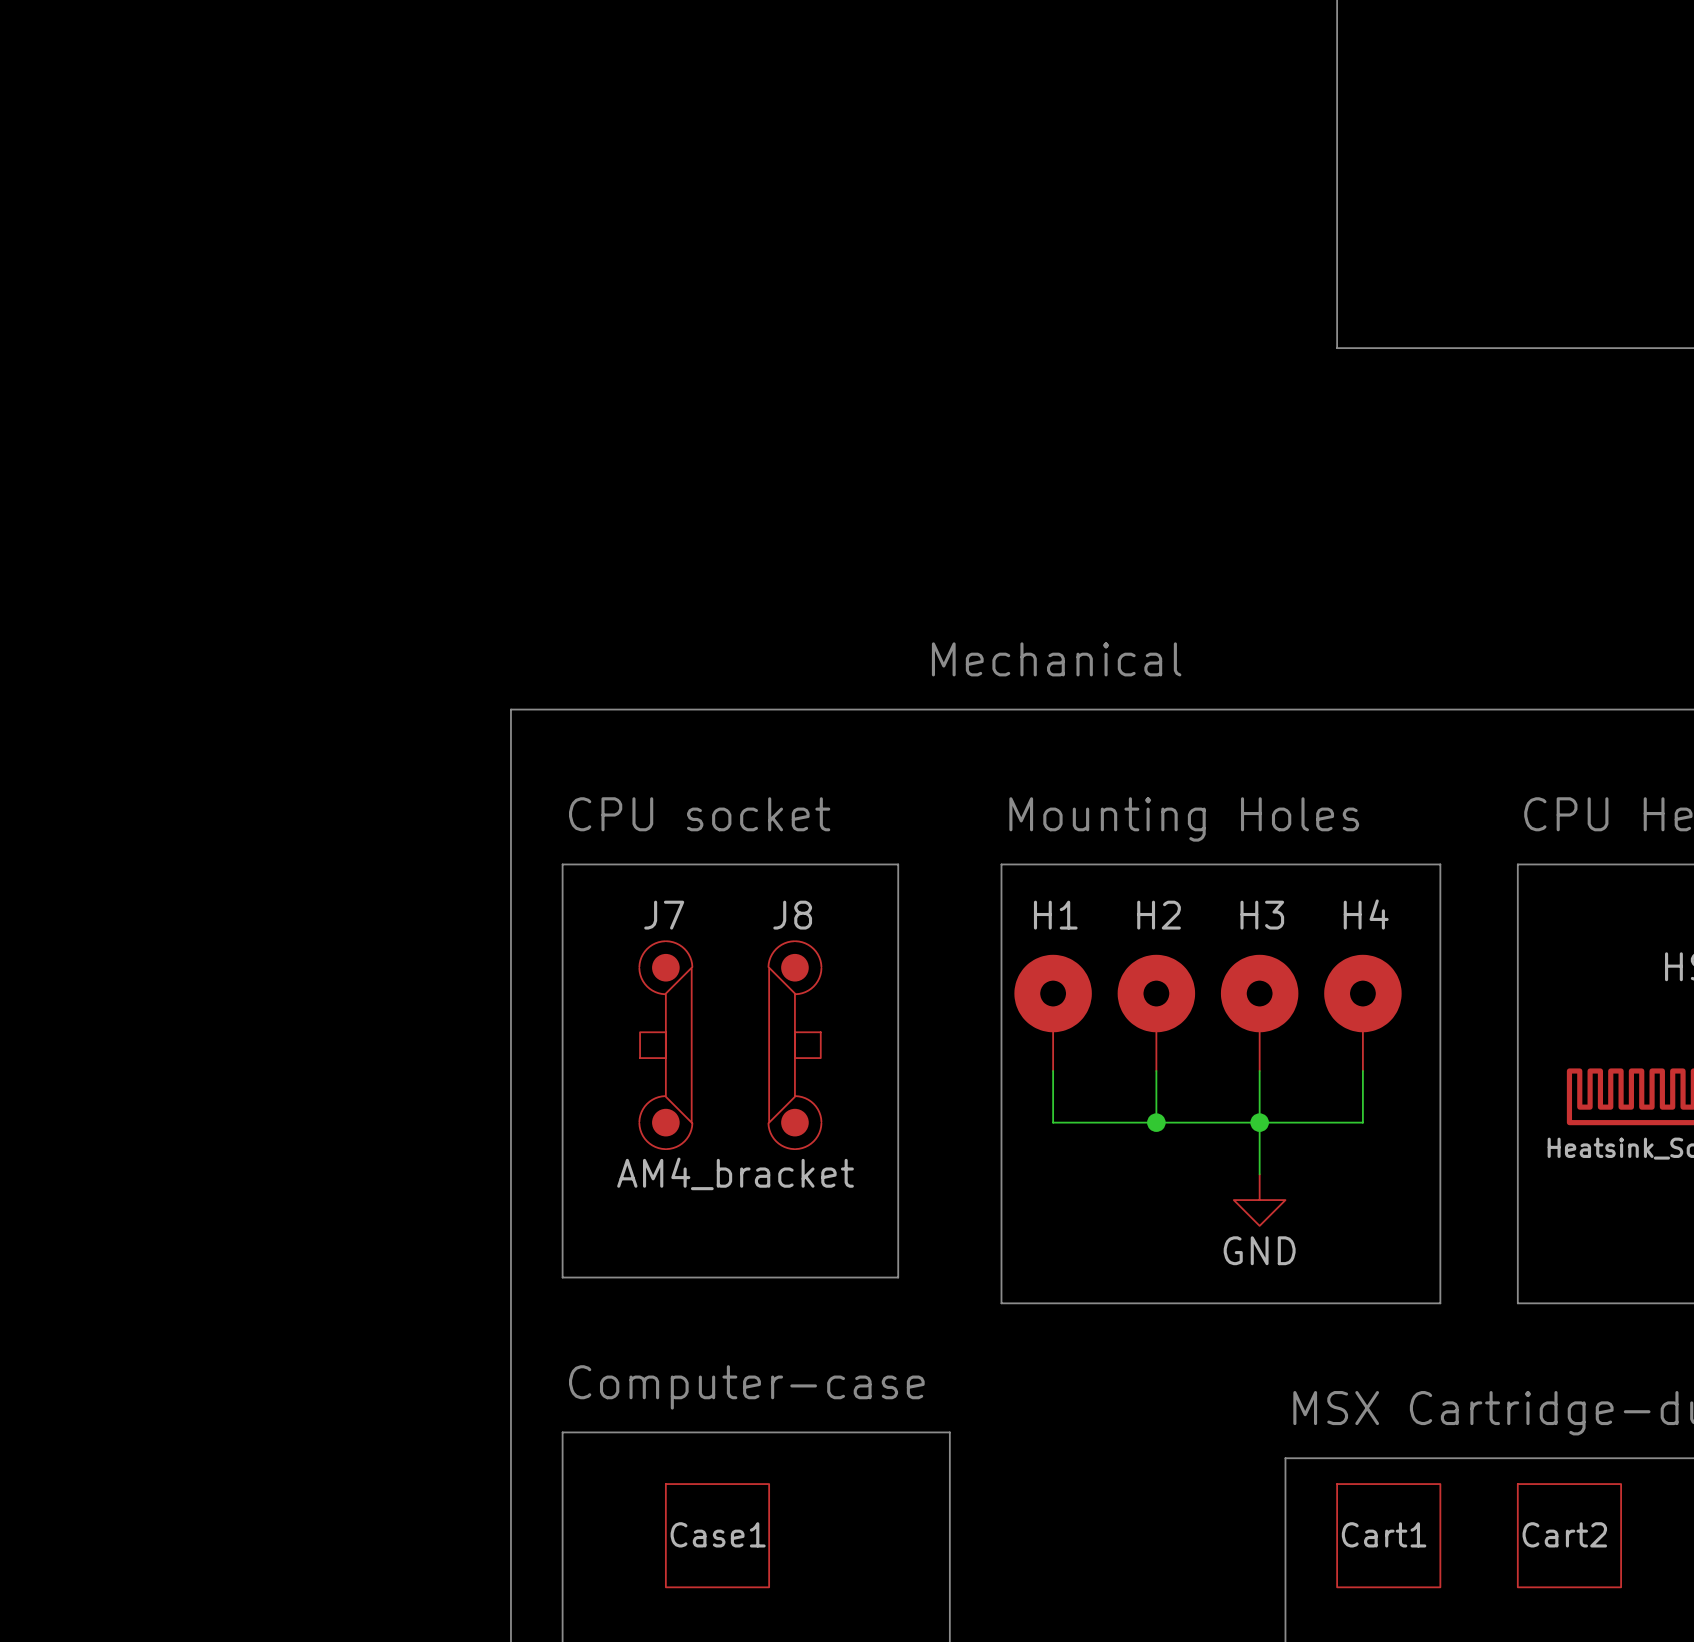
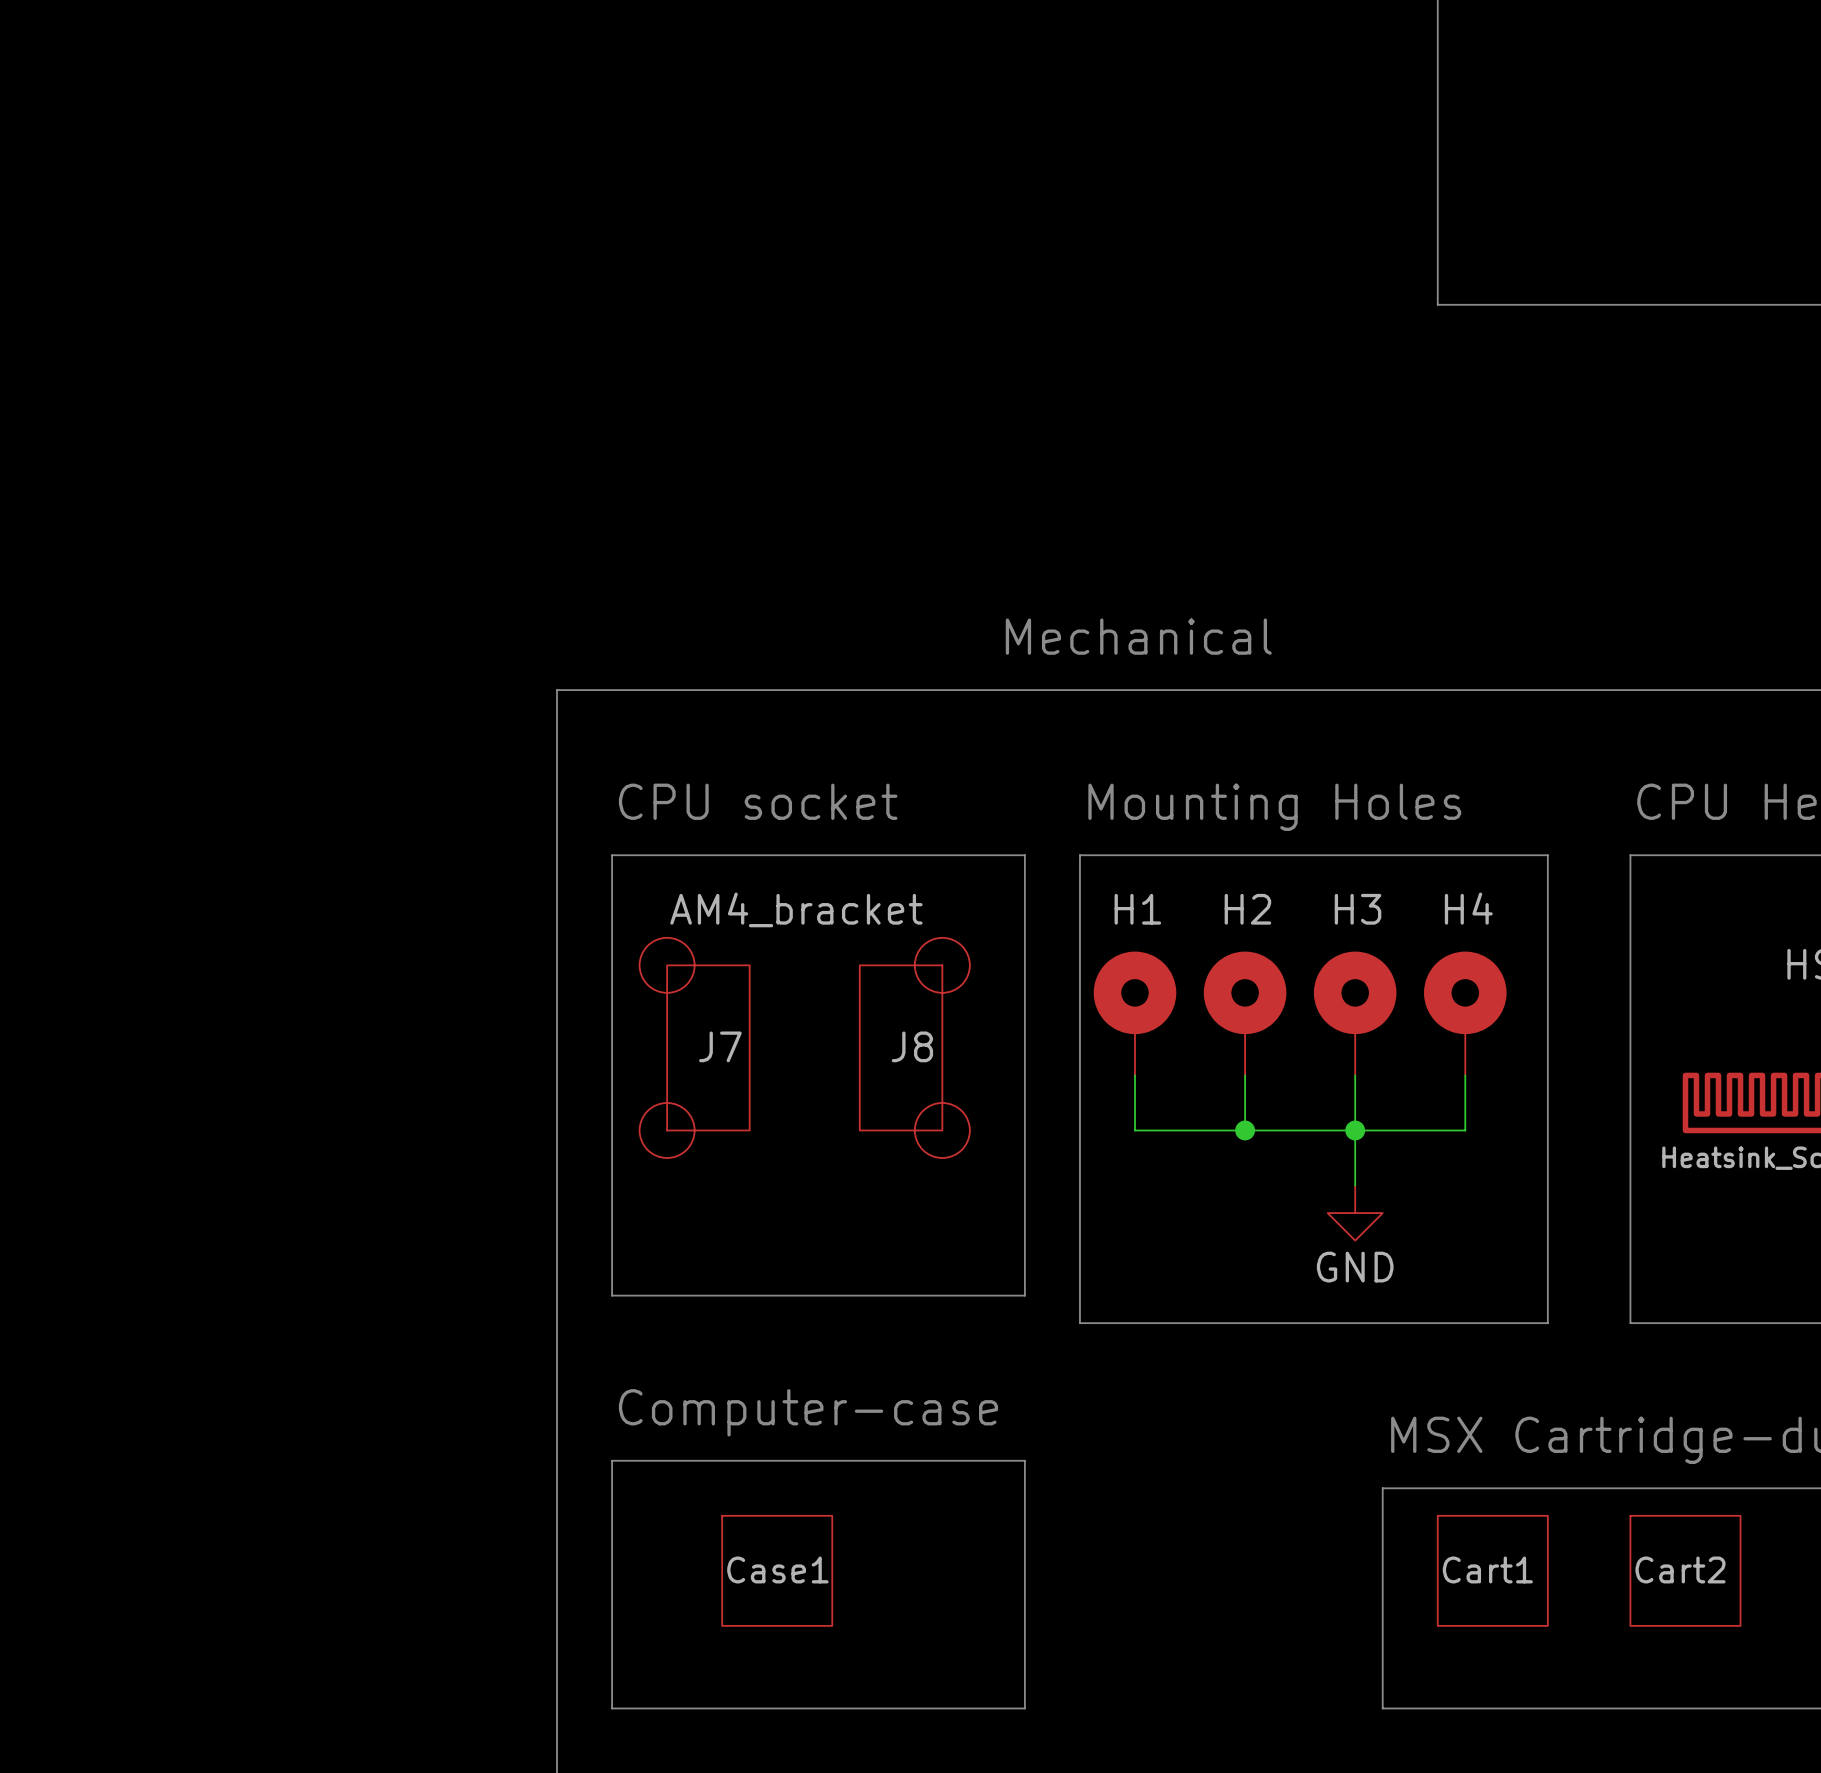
line: (898, 864) (898, 1277) -> (969, 855) (1024, 855) (1024, 1295) (969, 1295)
J7 name position: J7 (664, 915) -> J7 (720, 1046)
J8 name position: J8 (792, 915) -> J8 (912, 1046)
J7 symbol: [639, 941, 693, 1150] -> [639, 937, 750, 1159]
J8 symbol: [768, 941, 822, 1150] -> [859, 937, 970, 1159]
J8 value position: AM4_bracket (735, 1173) -> AM4_bracket (796, 909)

